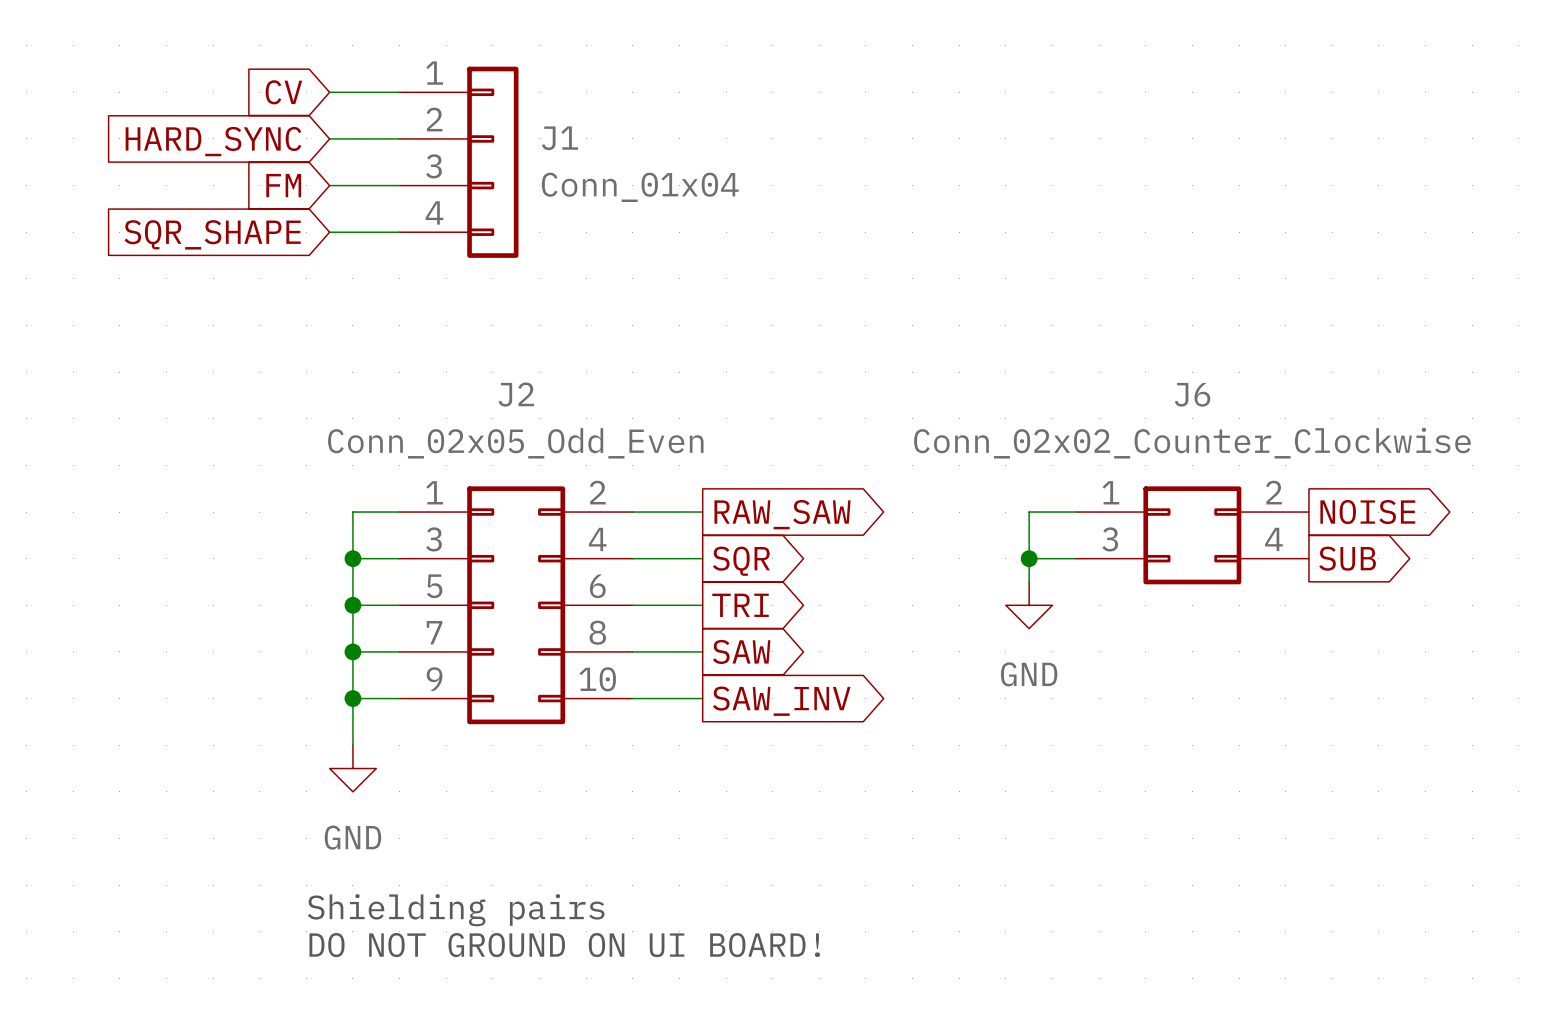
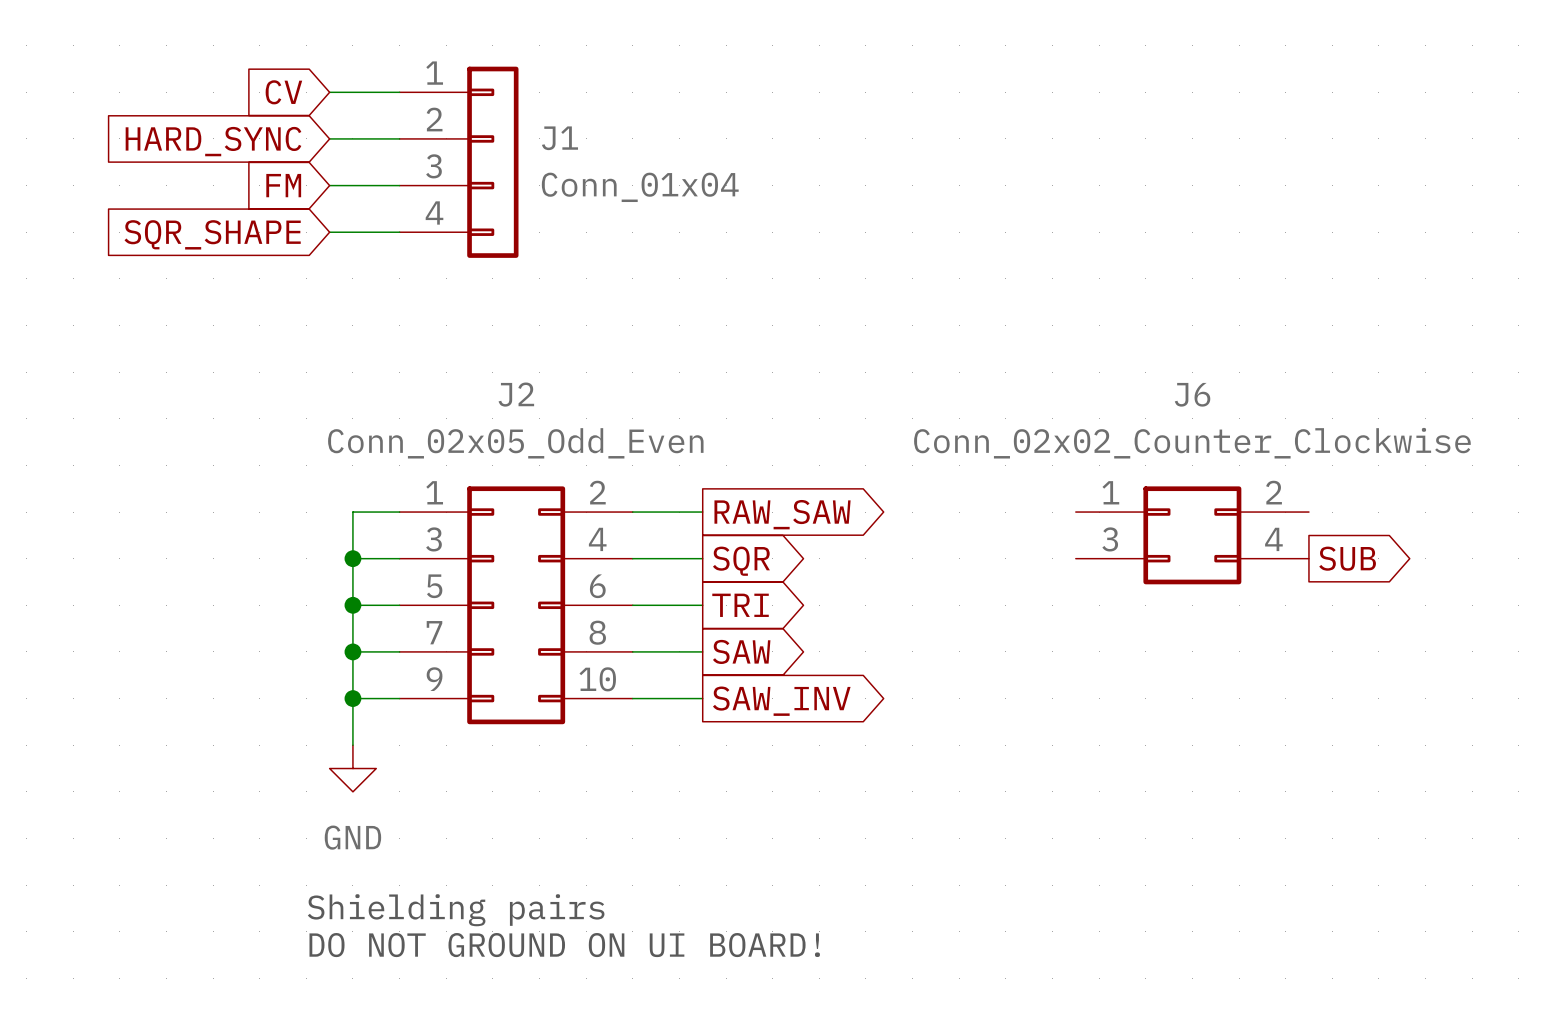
wire: (1075, 512) (1029, 512) (1029, 581) -> none
global label: NOISE (1367, 512) -> none
wire: (1029, 558) (1075, 558) -> none
junction: (1029, 558) -> none
power symbol: GND (1029, 605) -> none

